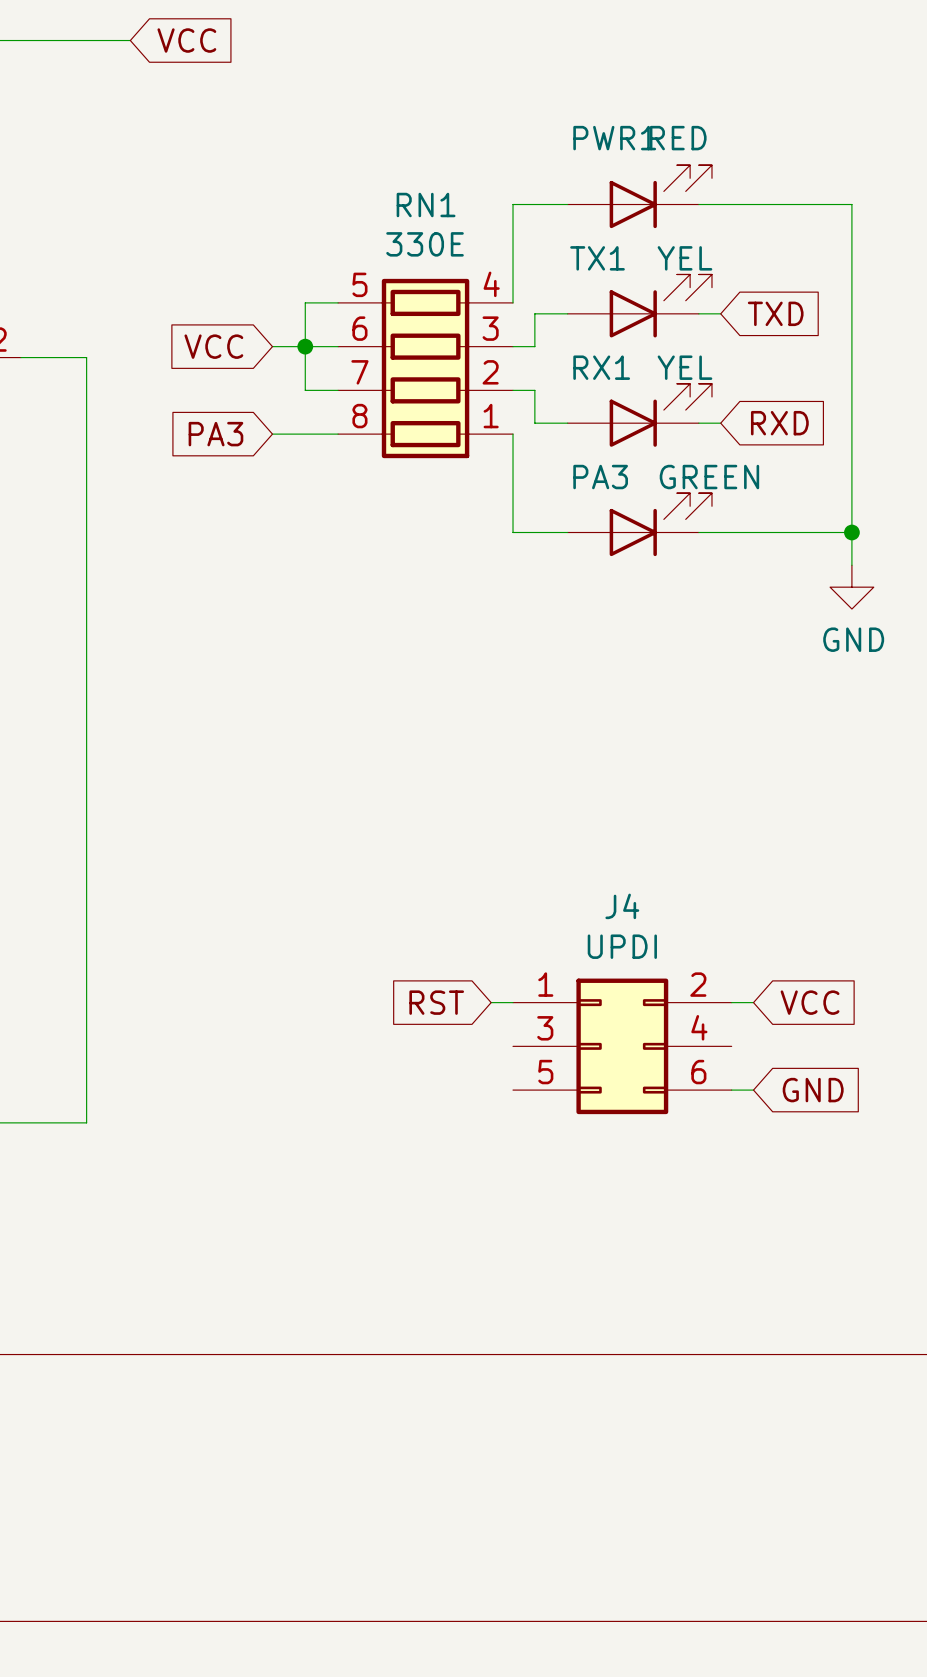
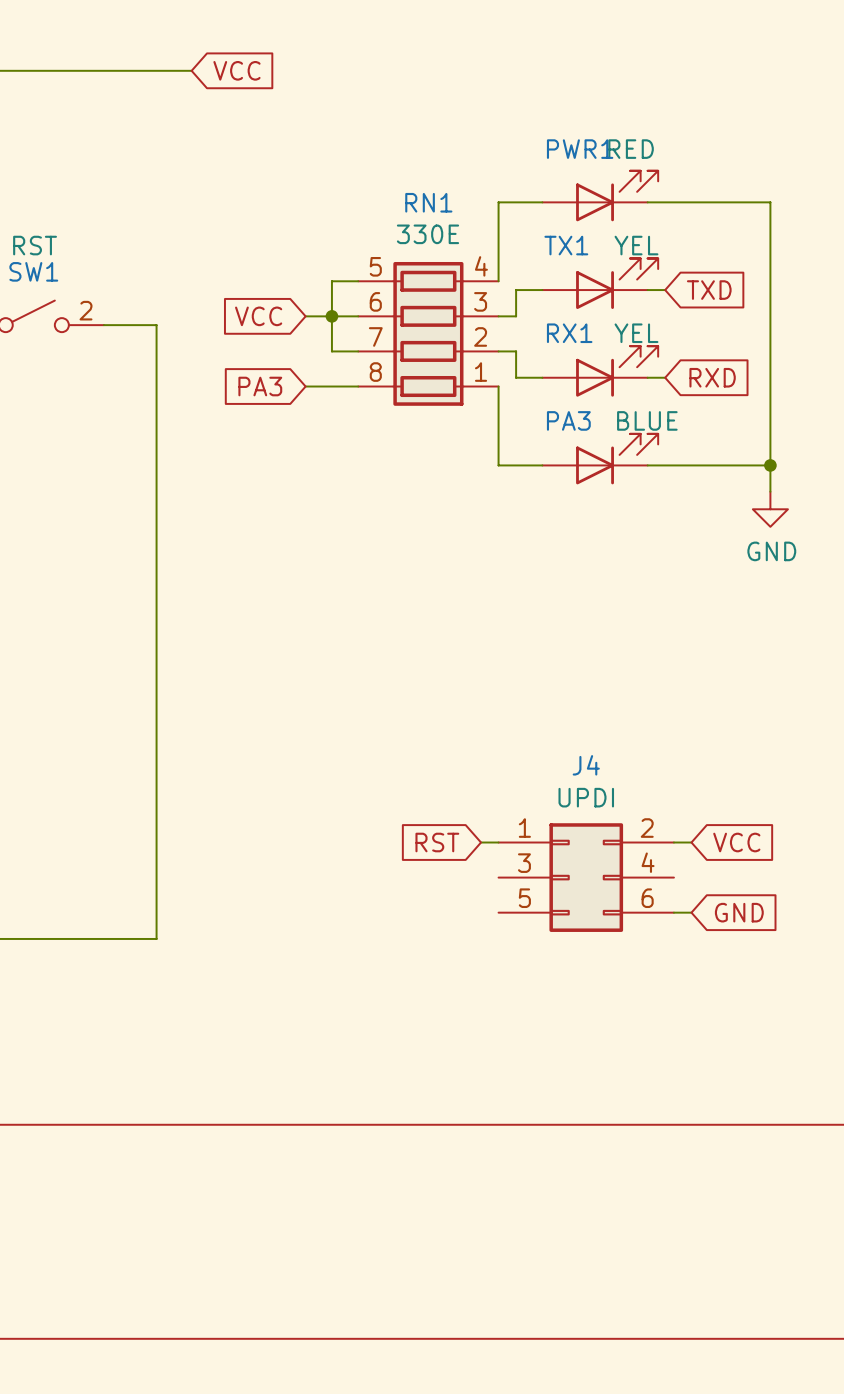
PA3 value: GREEN (709, 477) -> BLUE (647, 420)

